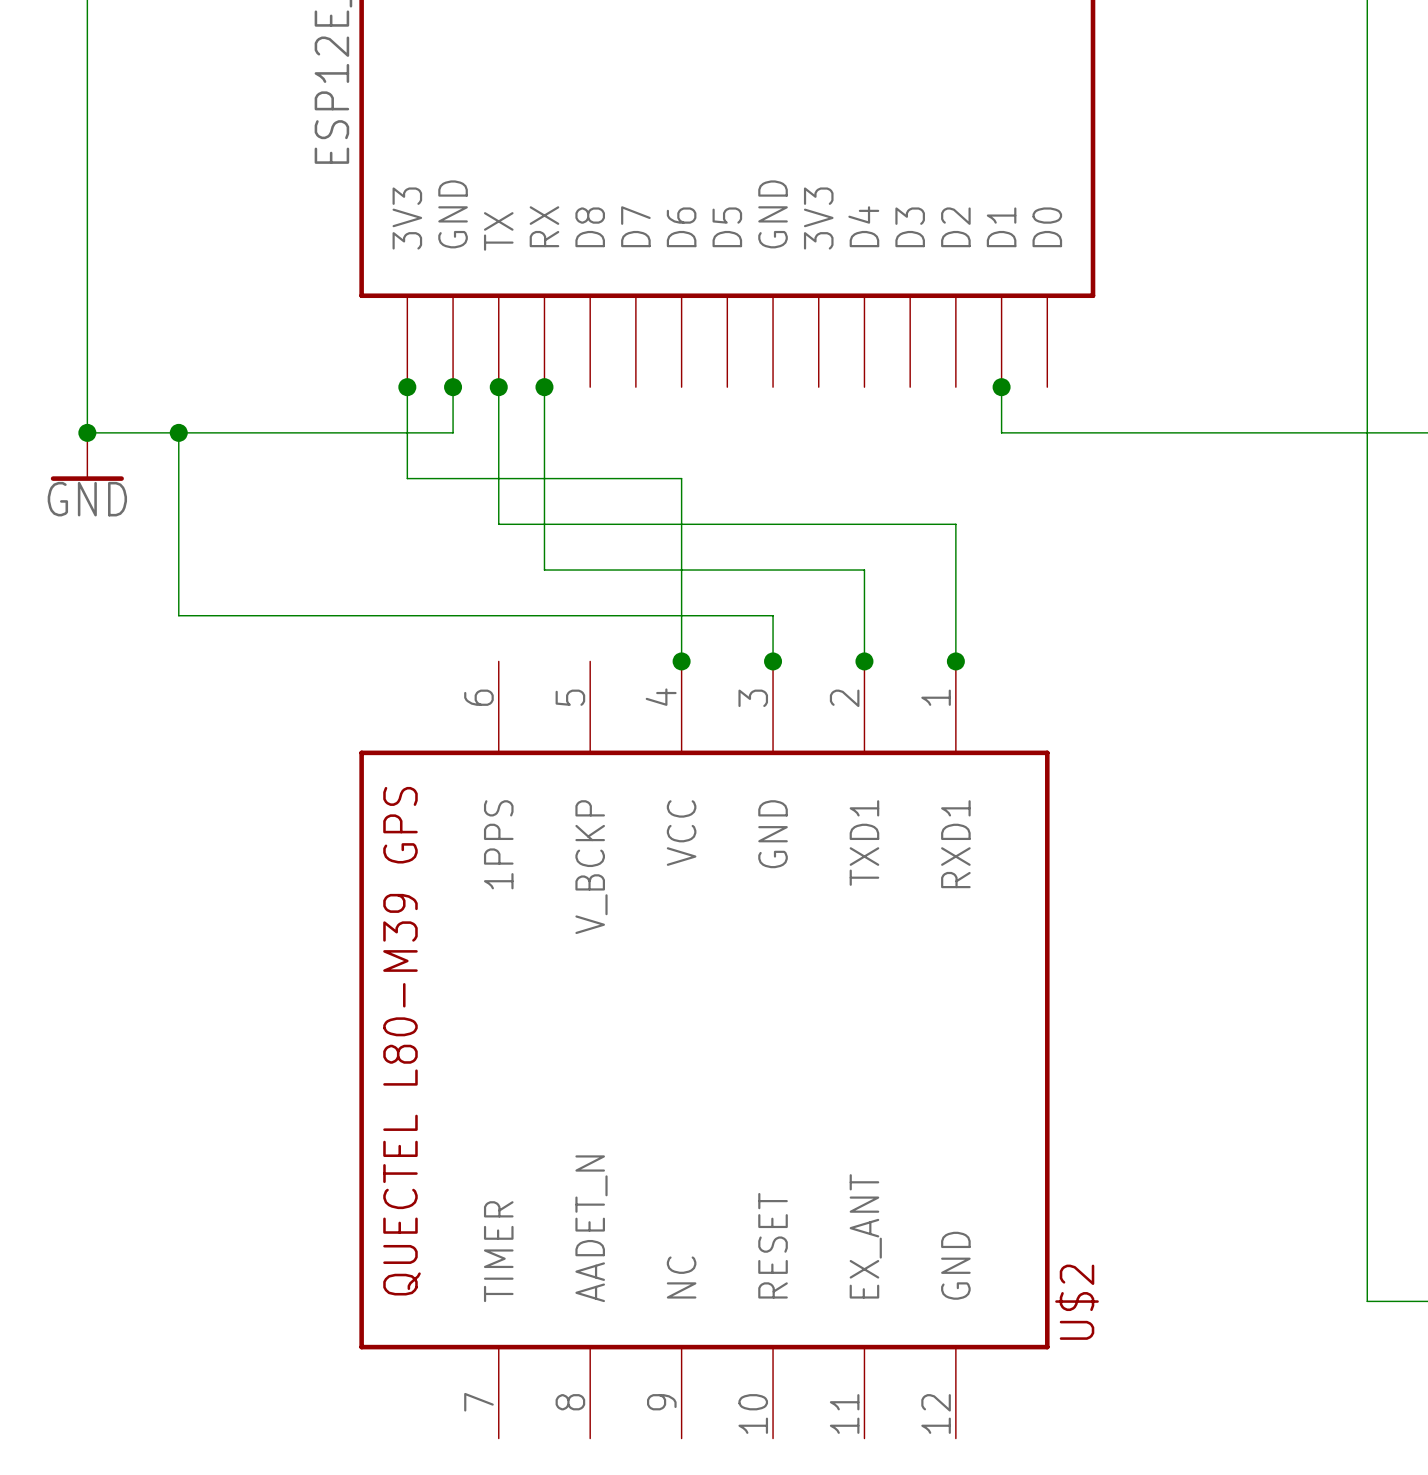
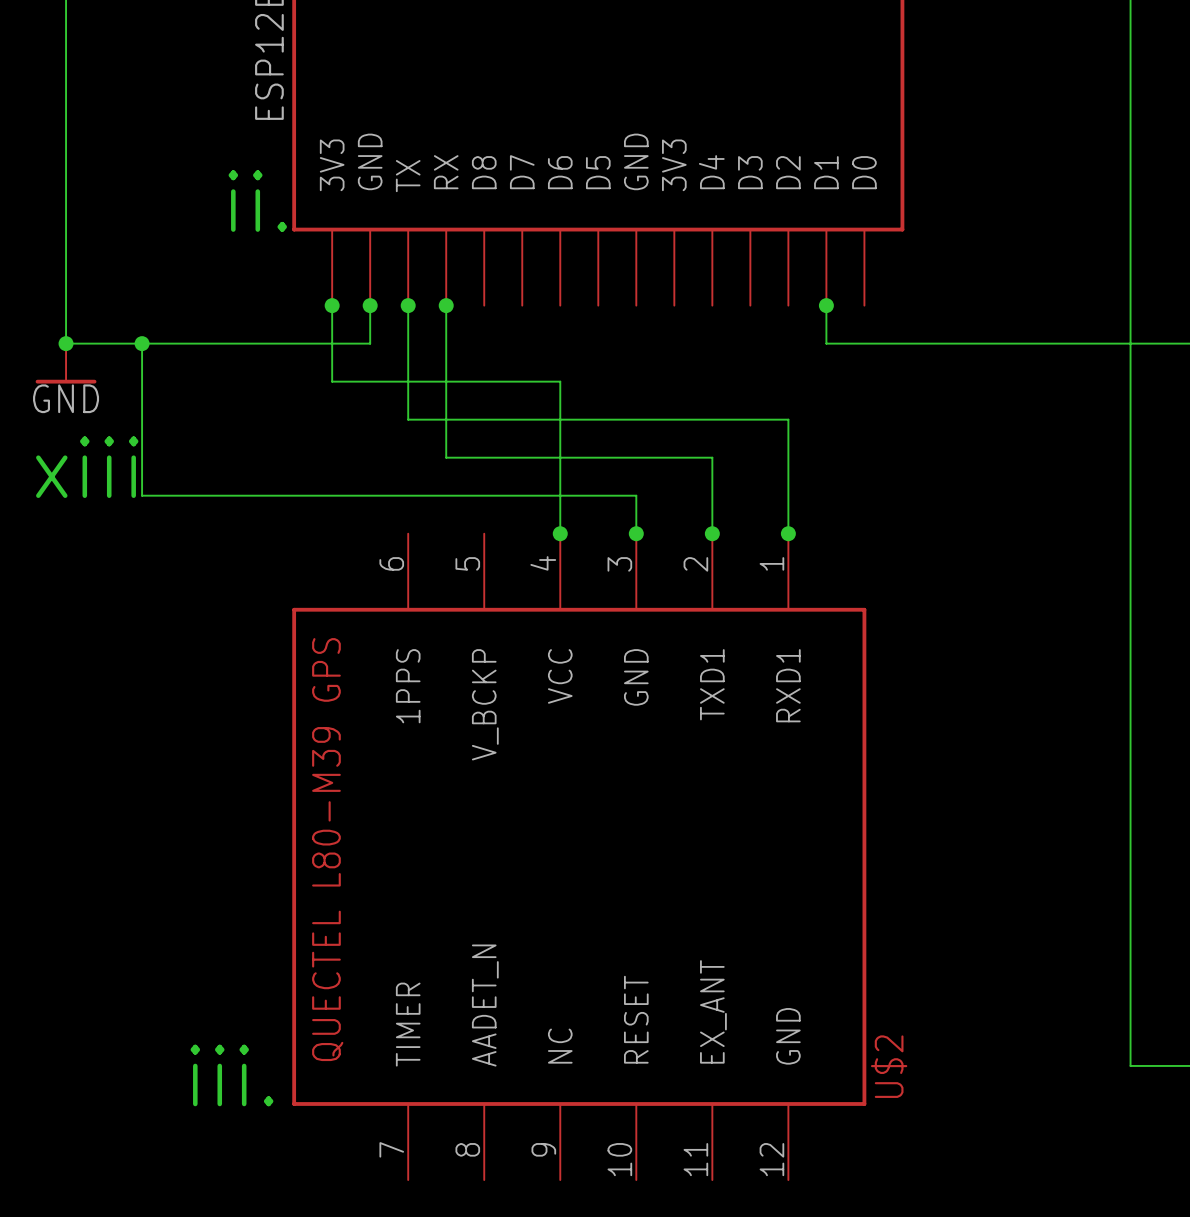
text: none -> ii. (257, 201)
text: none -> xiii (87, 467)
text: none -> iii. (231, 1075)

